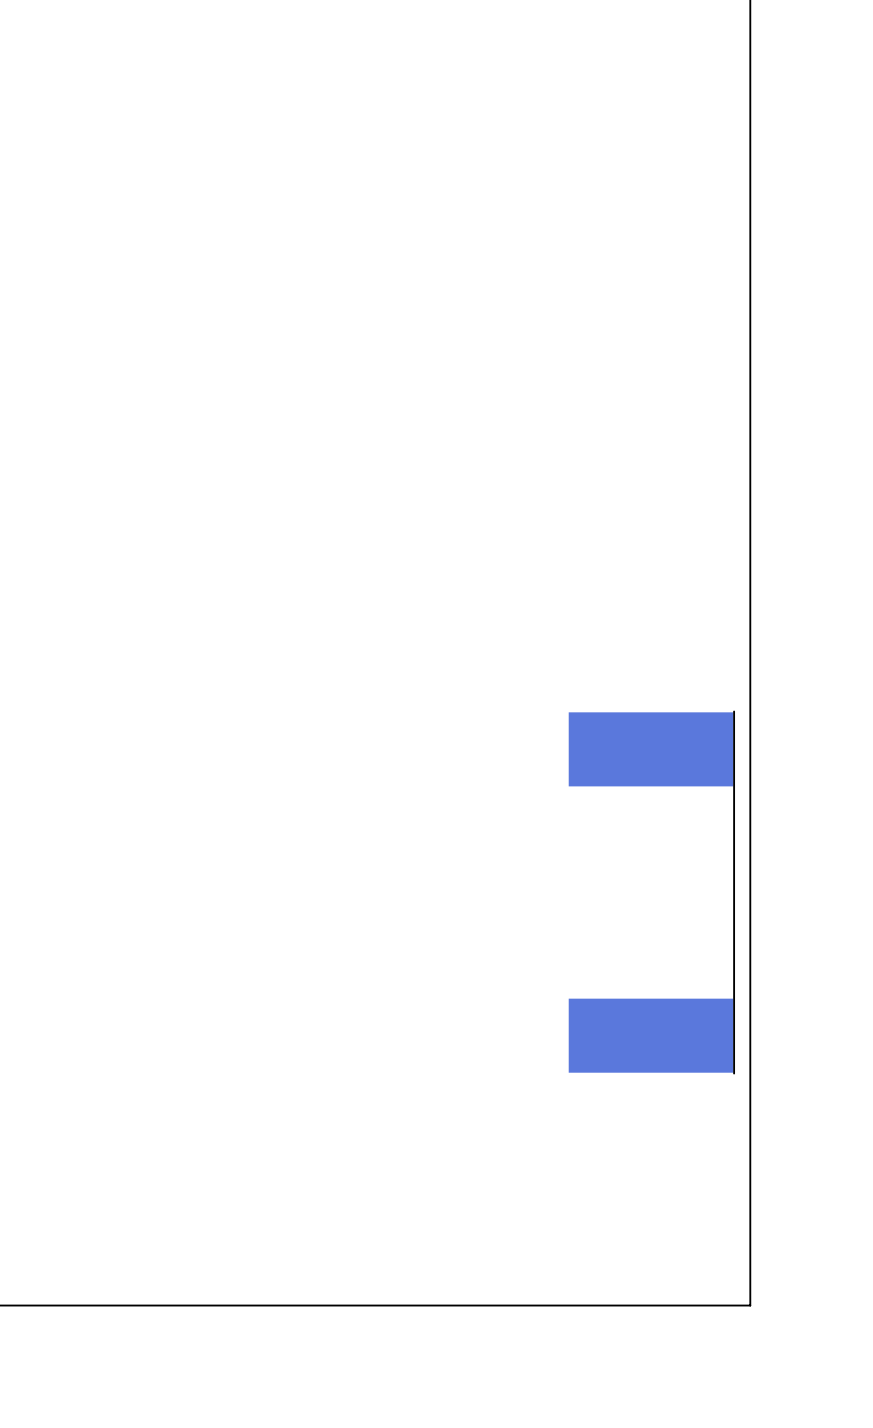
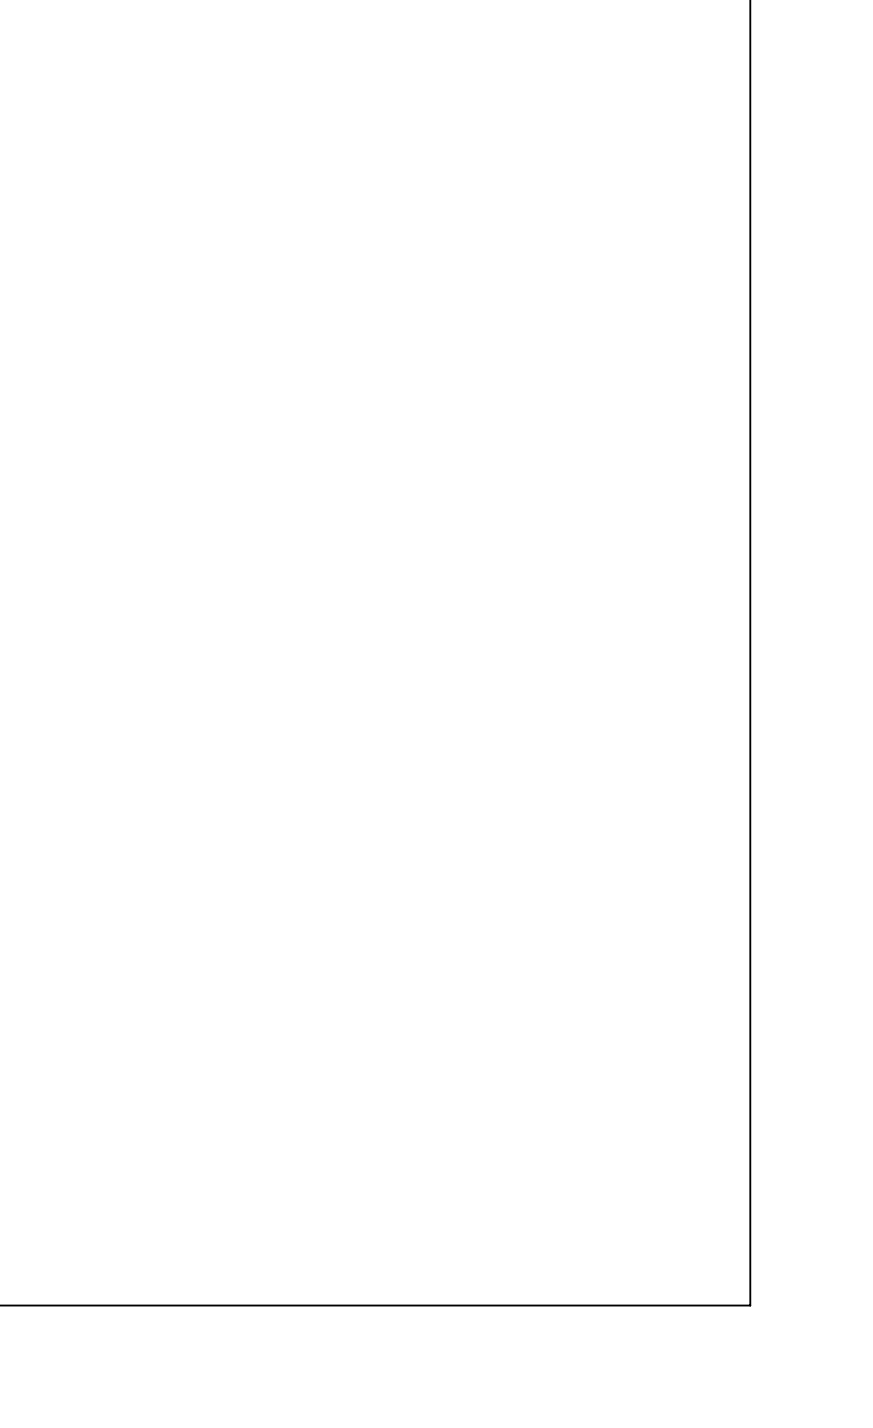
part: (651, 892) -> none

